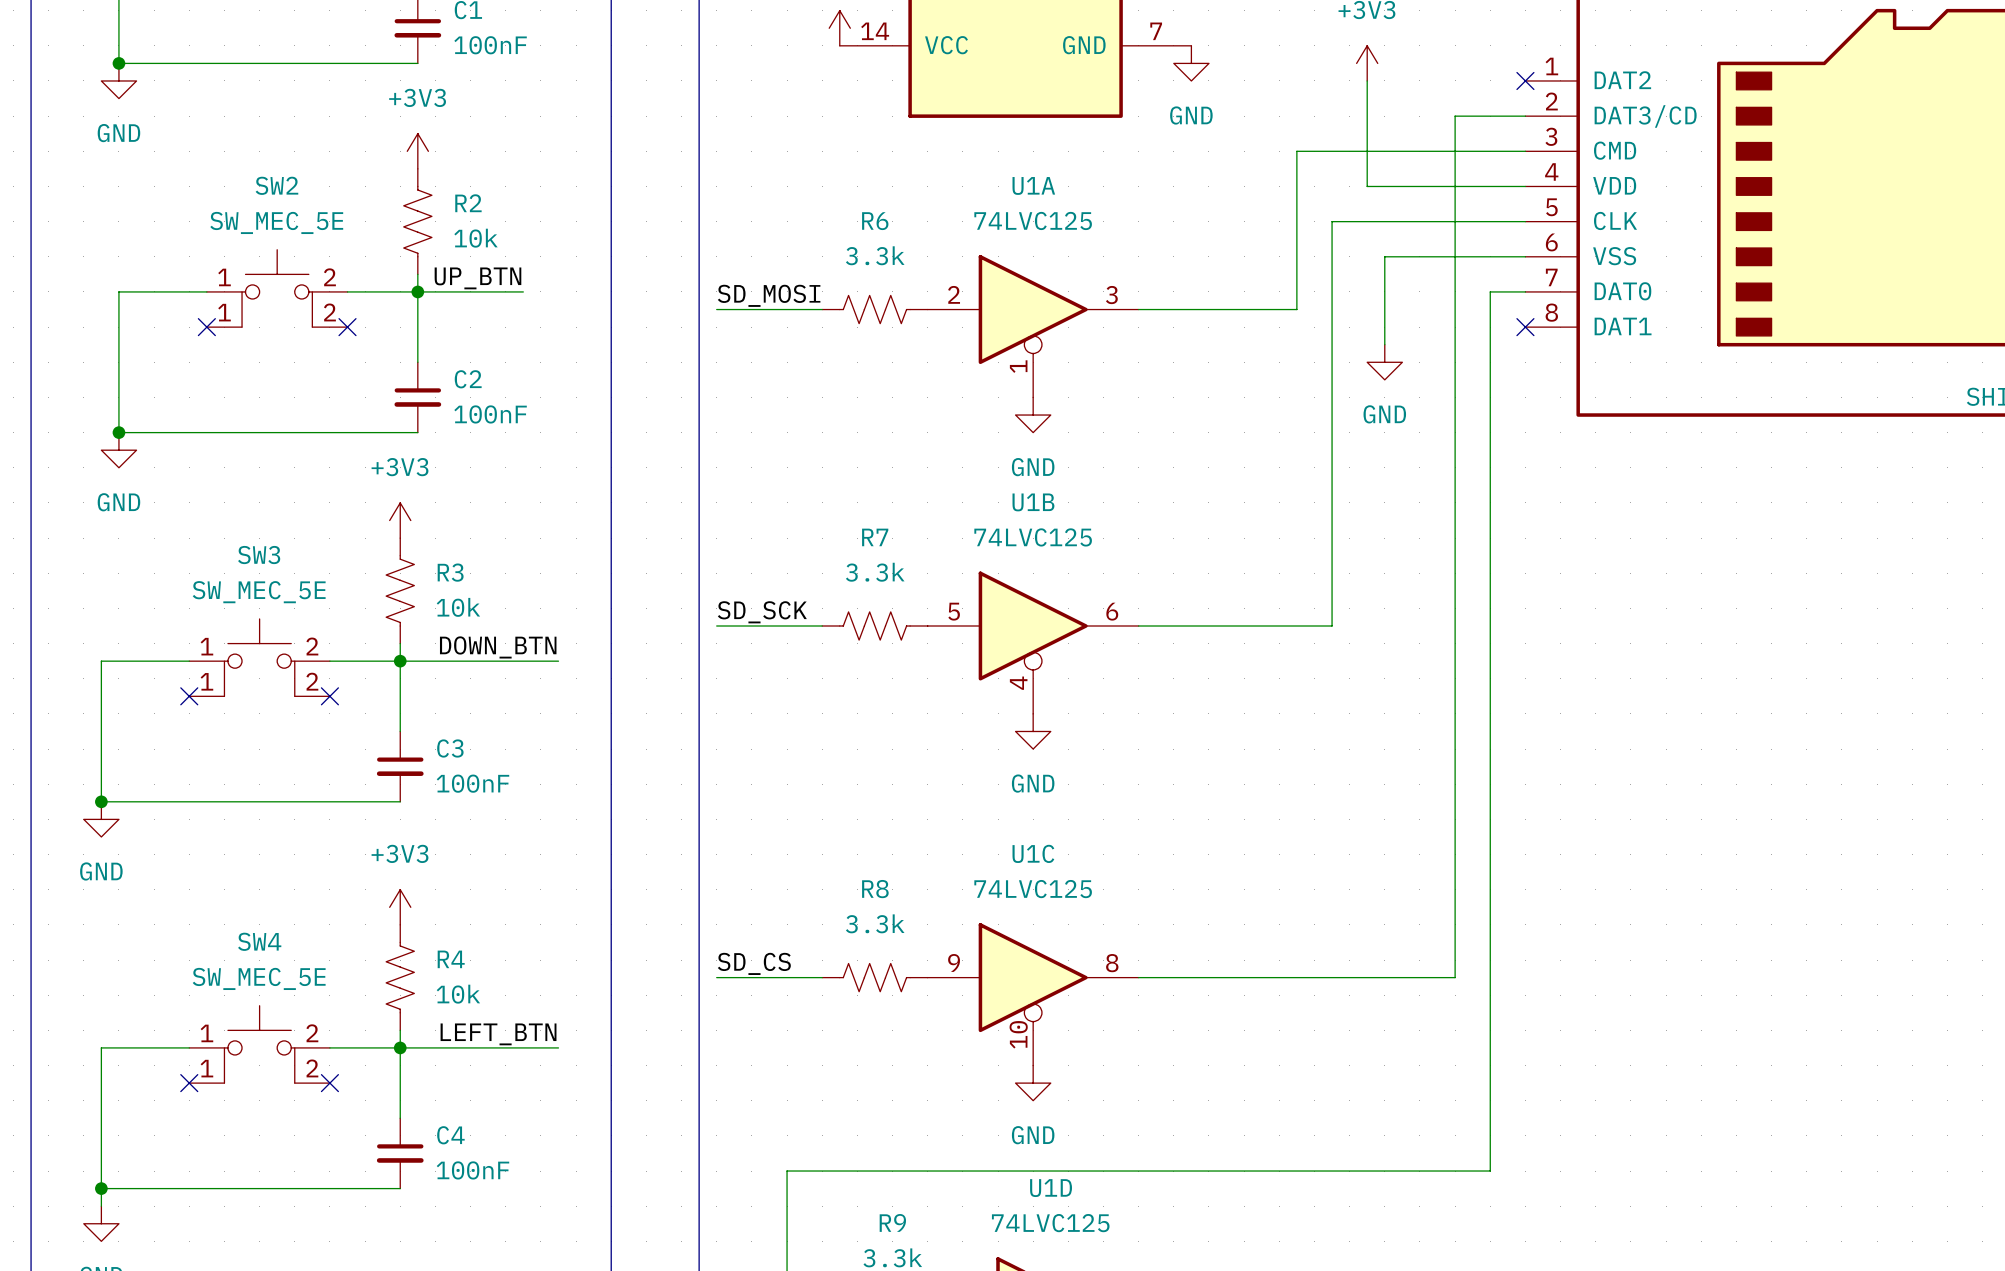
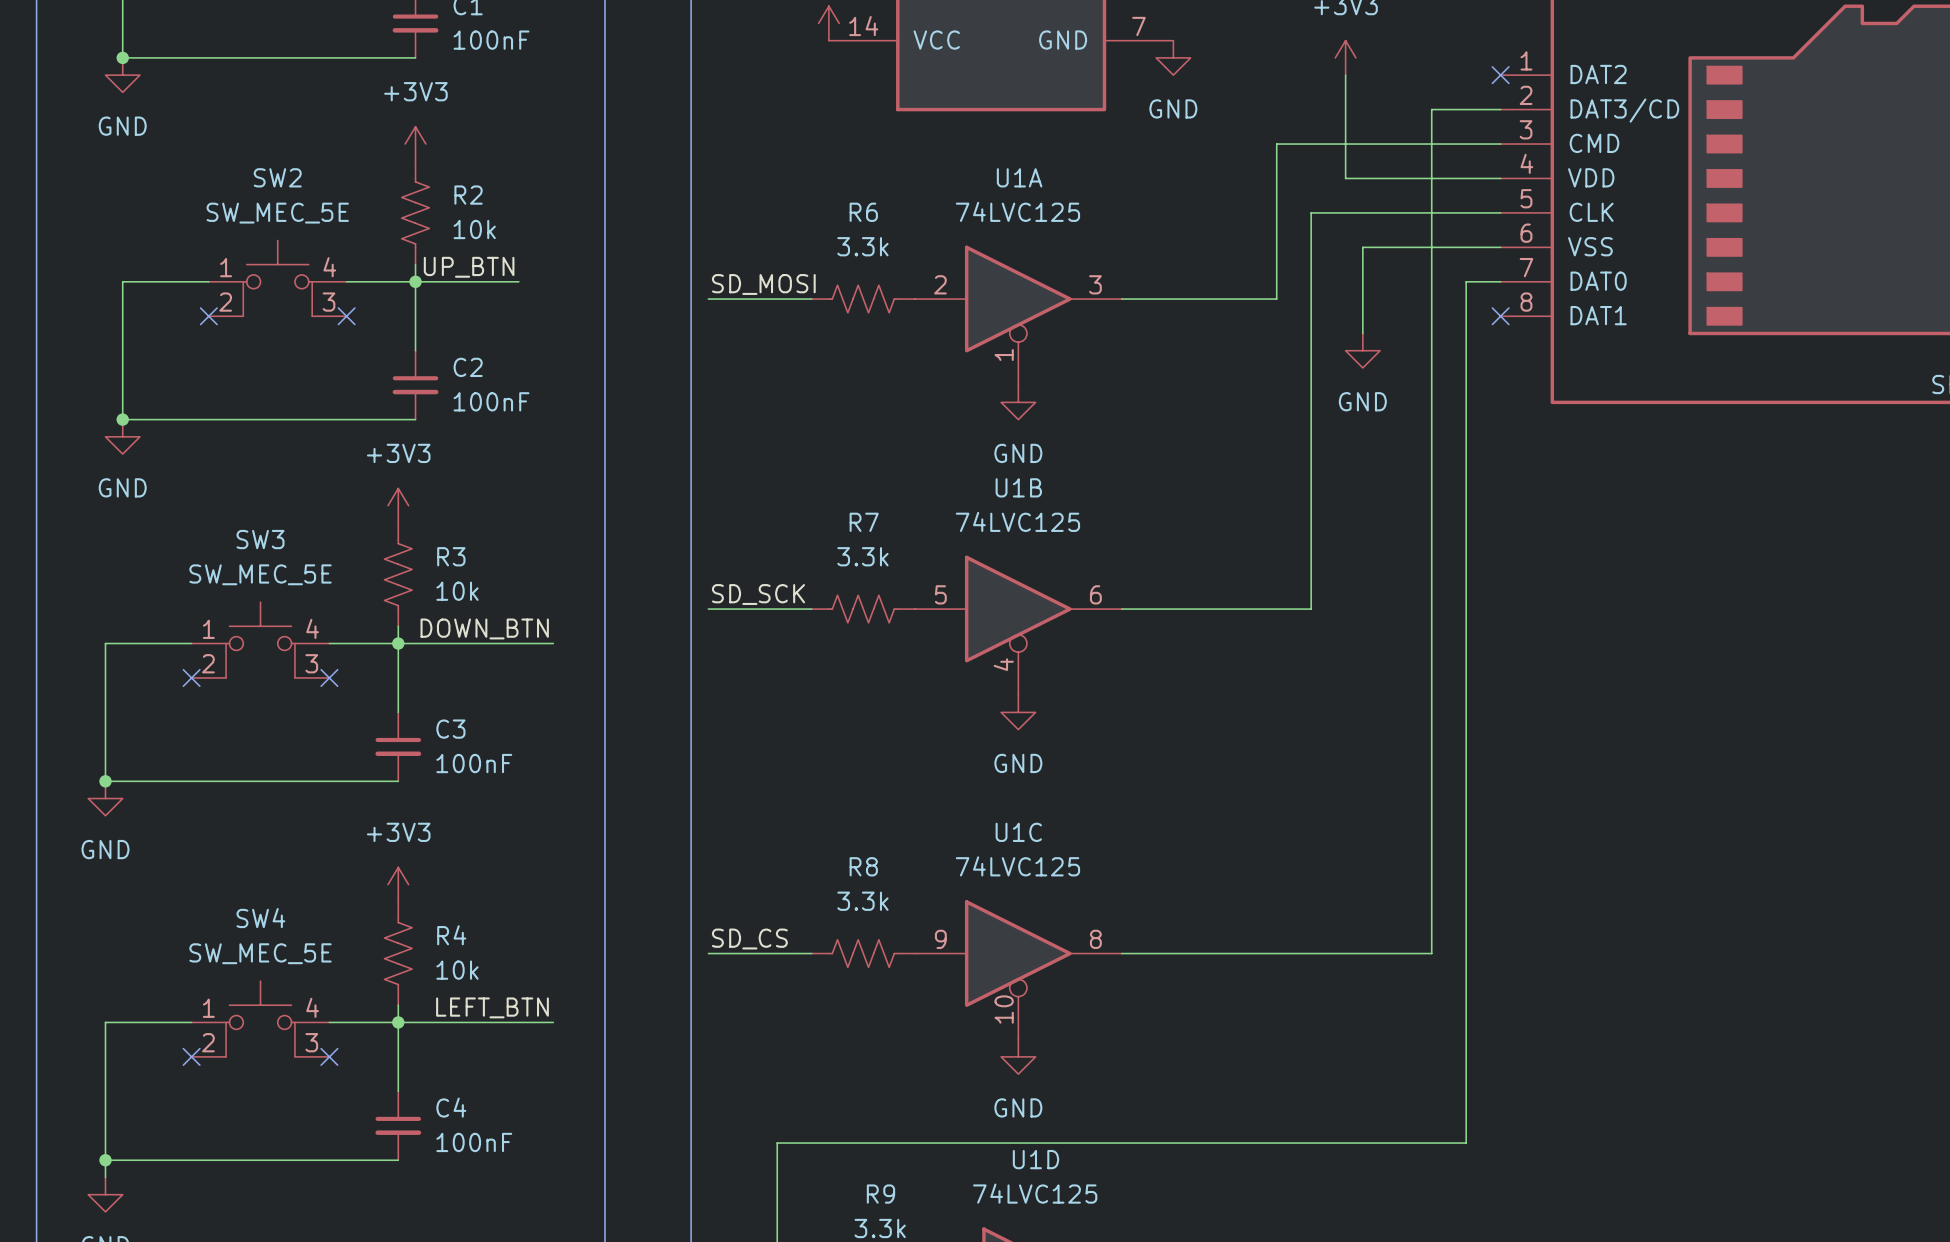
SW2 pin number: 2 (329, 277) -> 4 (329, 267)
SW2 pin number: 1 (224, 312) -> 2 (225, 302)
SW2 pin number: 2 (329, 312) -> 3 (328, 302)
SW3 pin number: 2 (312, 646) -> 4 (312, 628)
SW3 pin number: 1 (206, 681) -> 2 (208, 663)
SW3 pin number: 2 (312, 681) -> 3 (311, 663)
SW4 pin number: 2 (312, 1033) -> 4 (312, 1007)
SW4 pin number: 1 (206, 1068) -> 2 (208, 1042)
SW4 pin number: 2 (312, 1068) -> 3 (311, 1042)

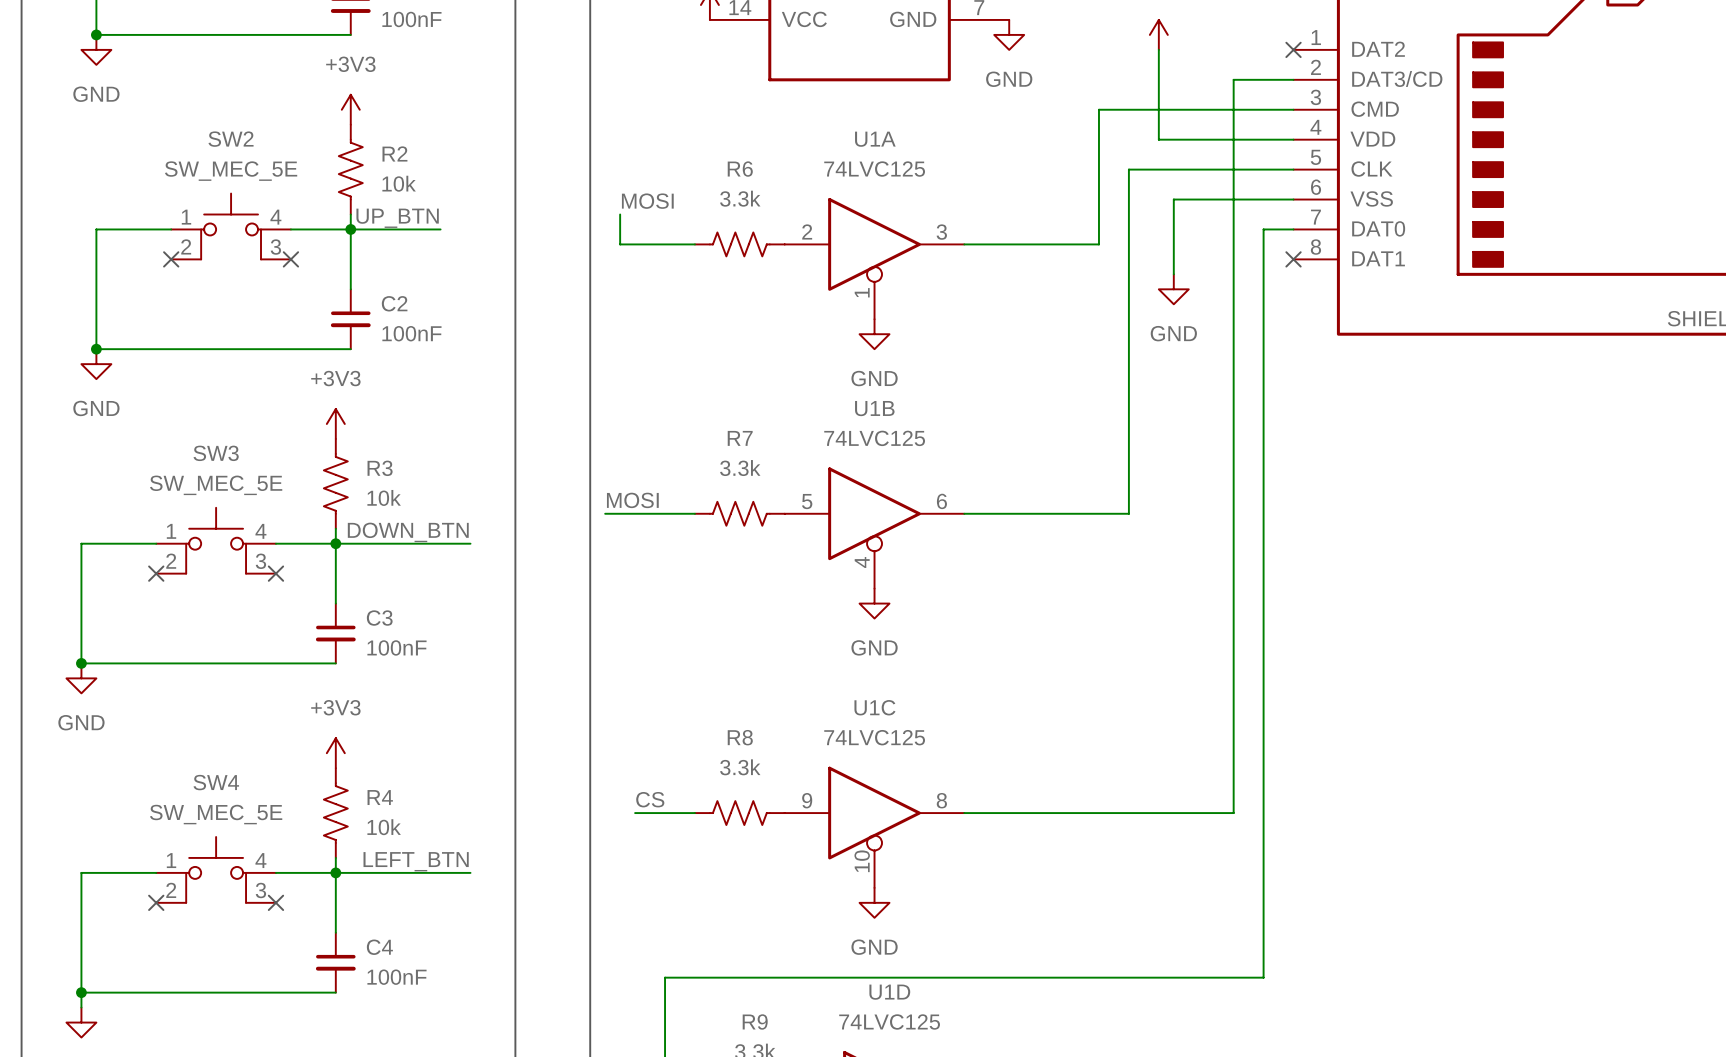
label: SD_MOSI (763, 284) -> MOSI (647, 201)
wire: (708, 299) (725, 299) -> (620, 214) (620, 244)
label: SD_SCK (758, 594) -> MOSI (632, 500)
label: none -> CS (650, 799)
label: SD_CS (749, 939) -> none
wire: (708, 953) (742, 953) -> none

